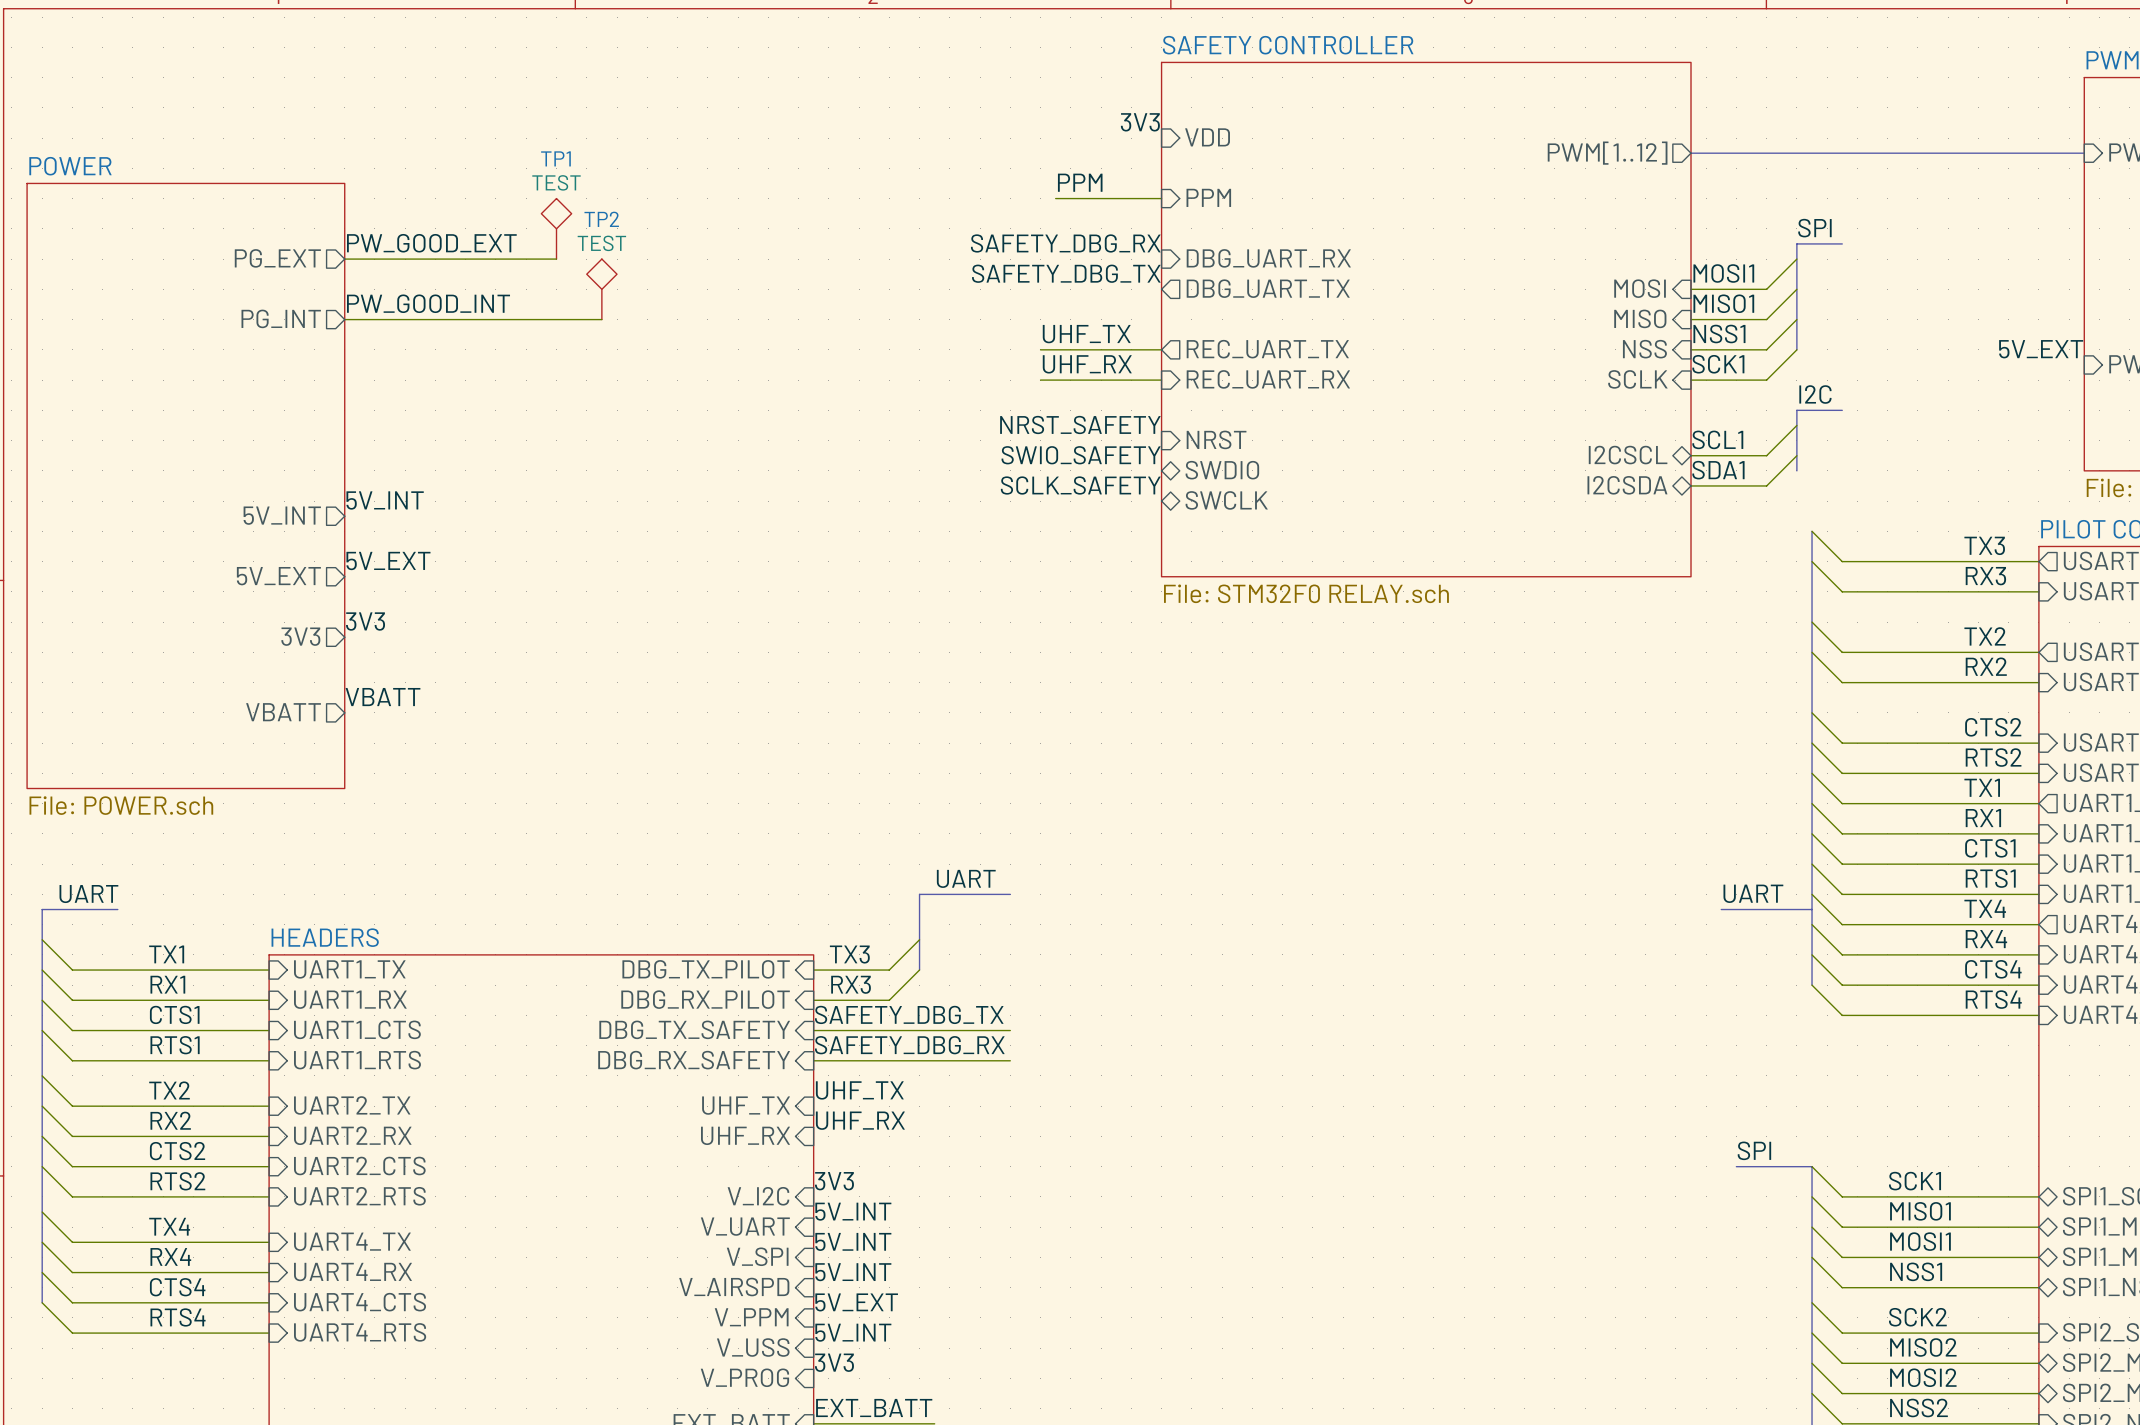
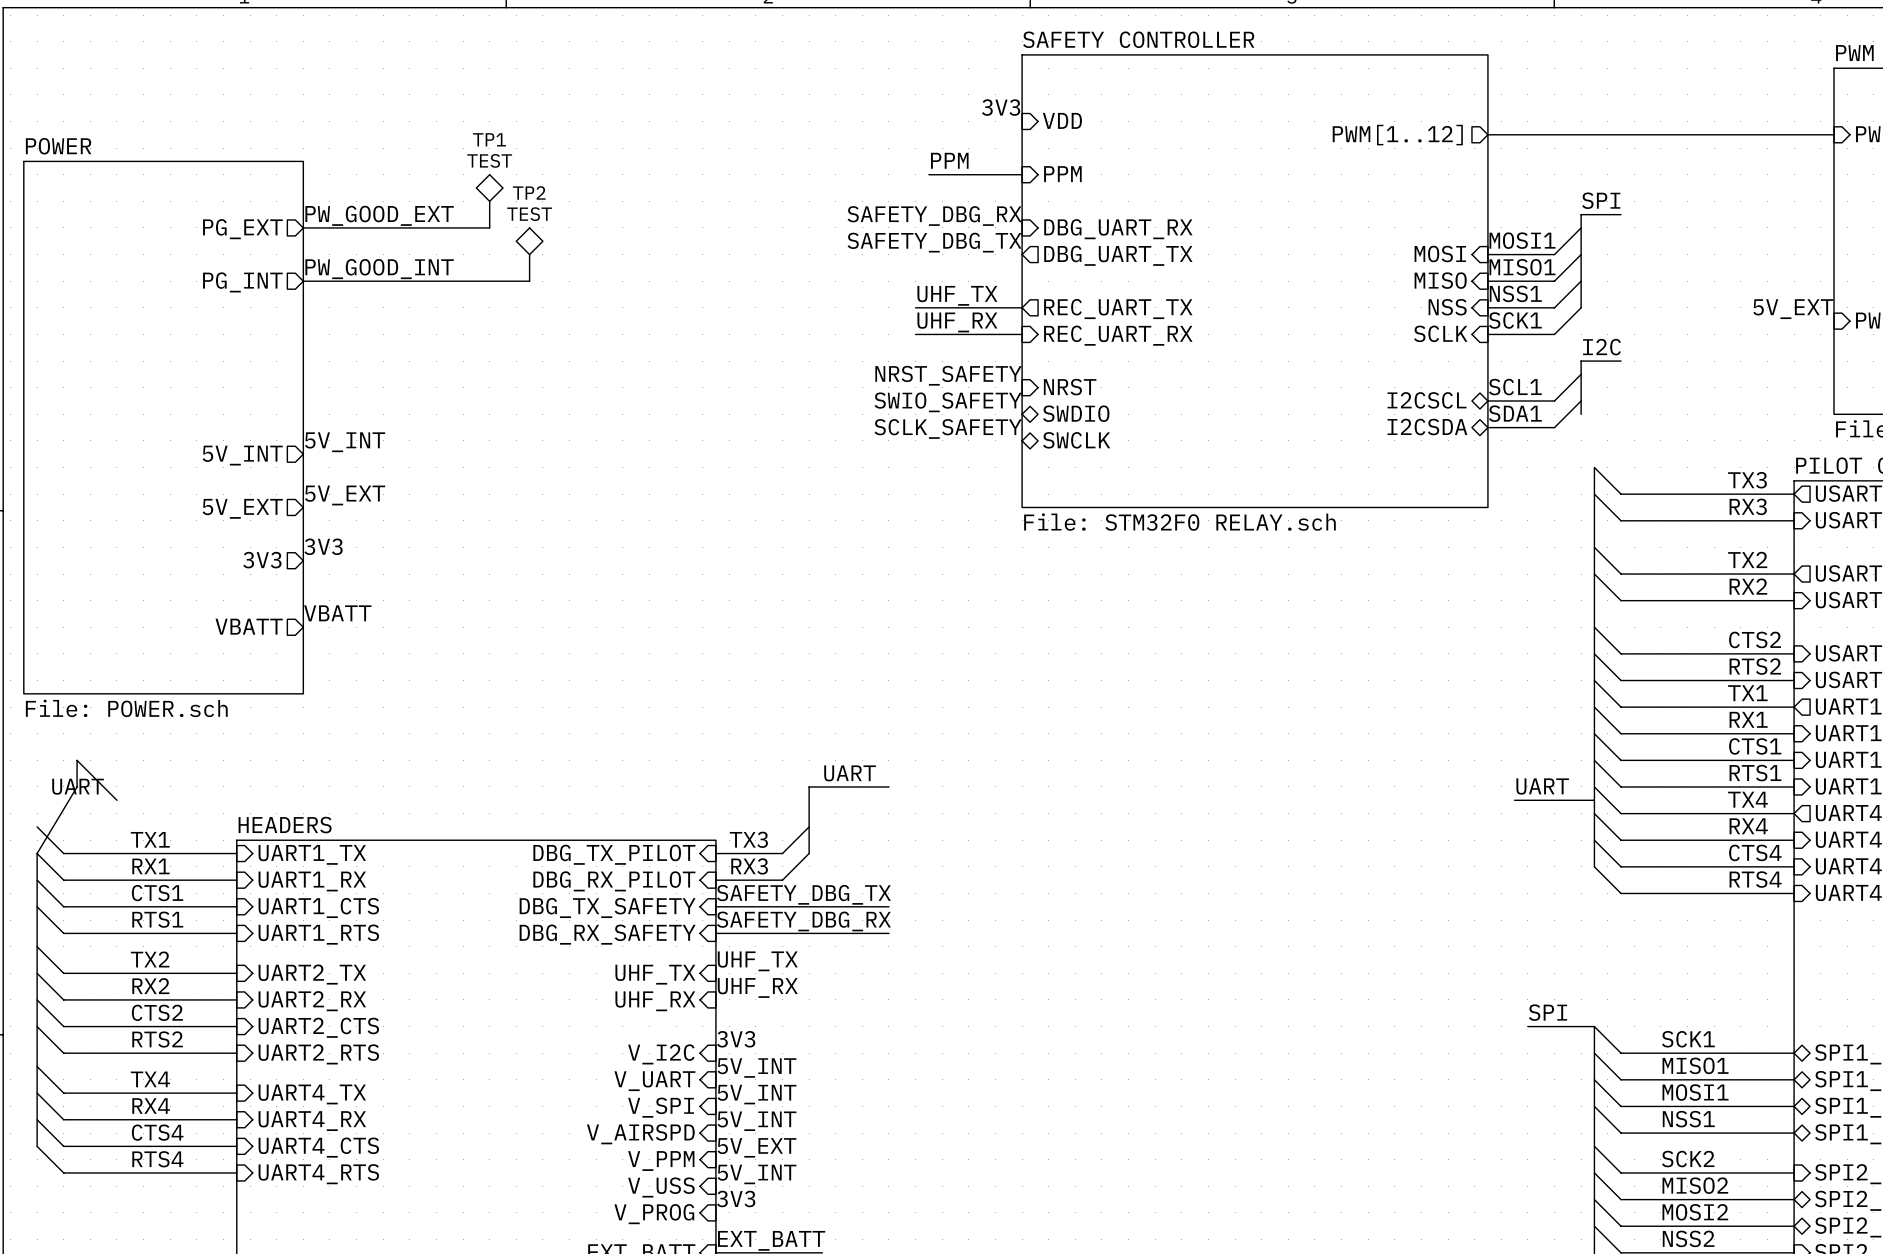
bus: (117, 909) (42, 909) (42, 970) -> (116, 800) (77, 760) (77, 786) (37, 853)

